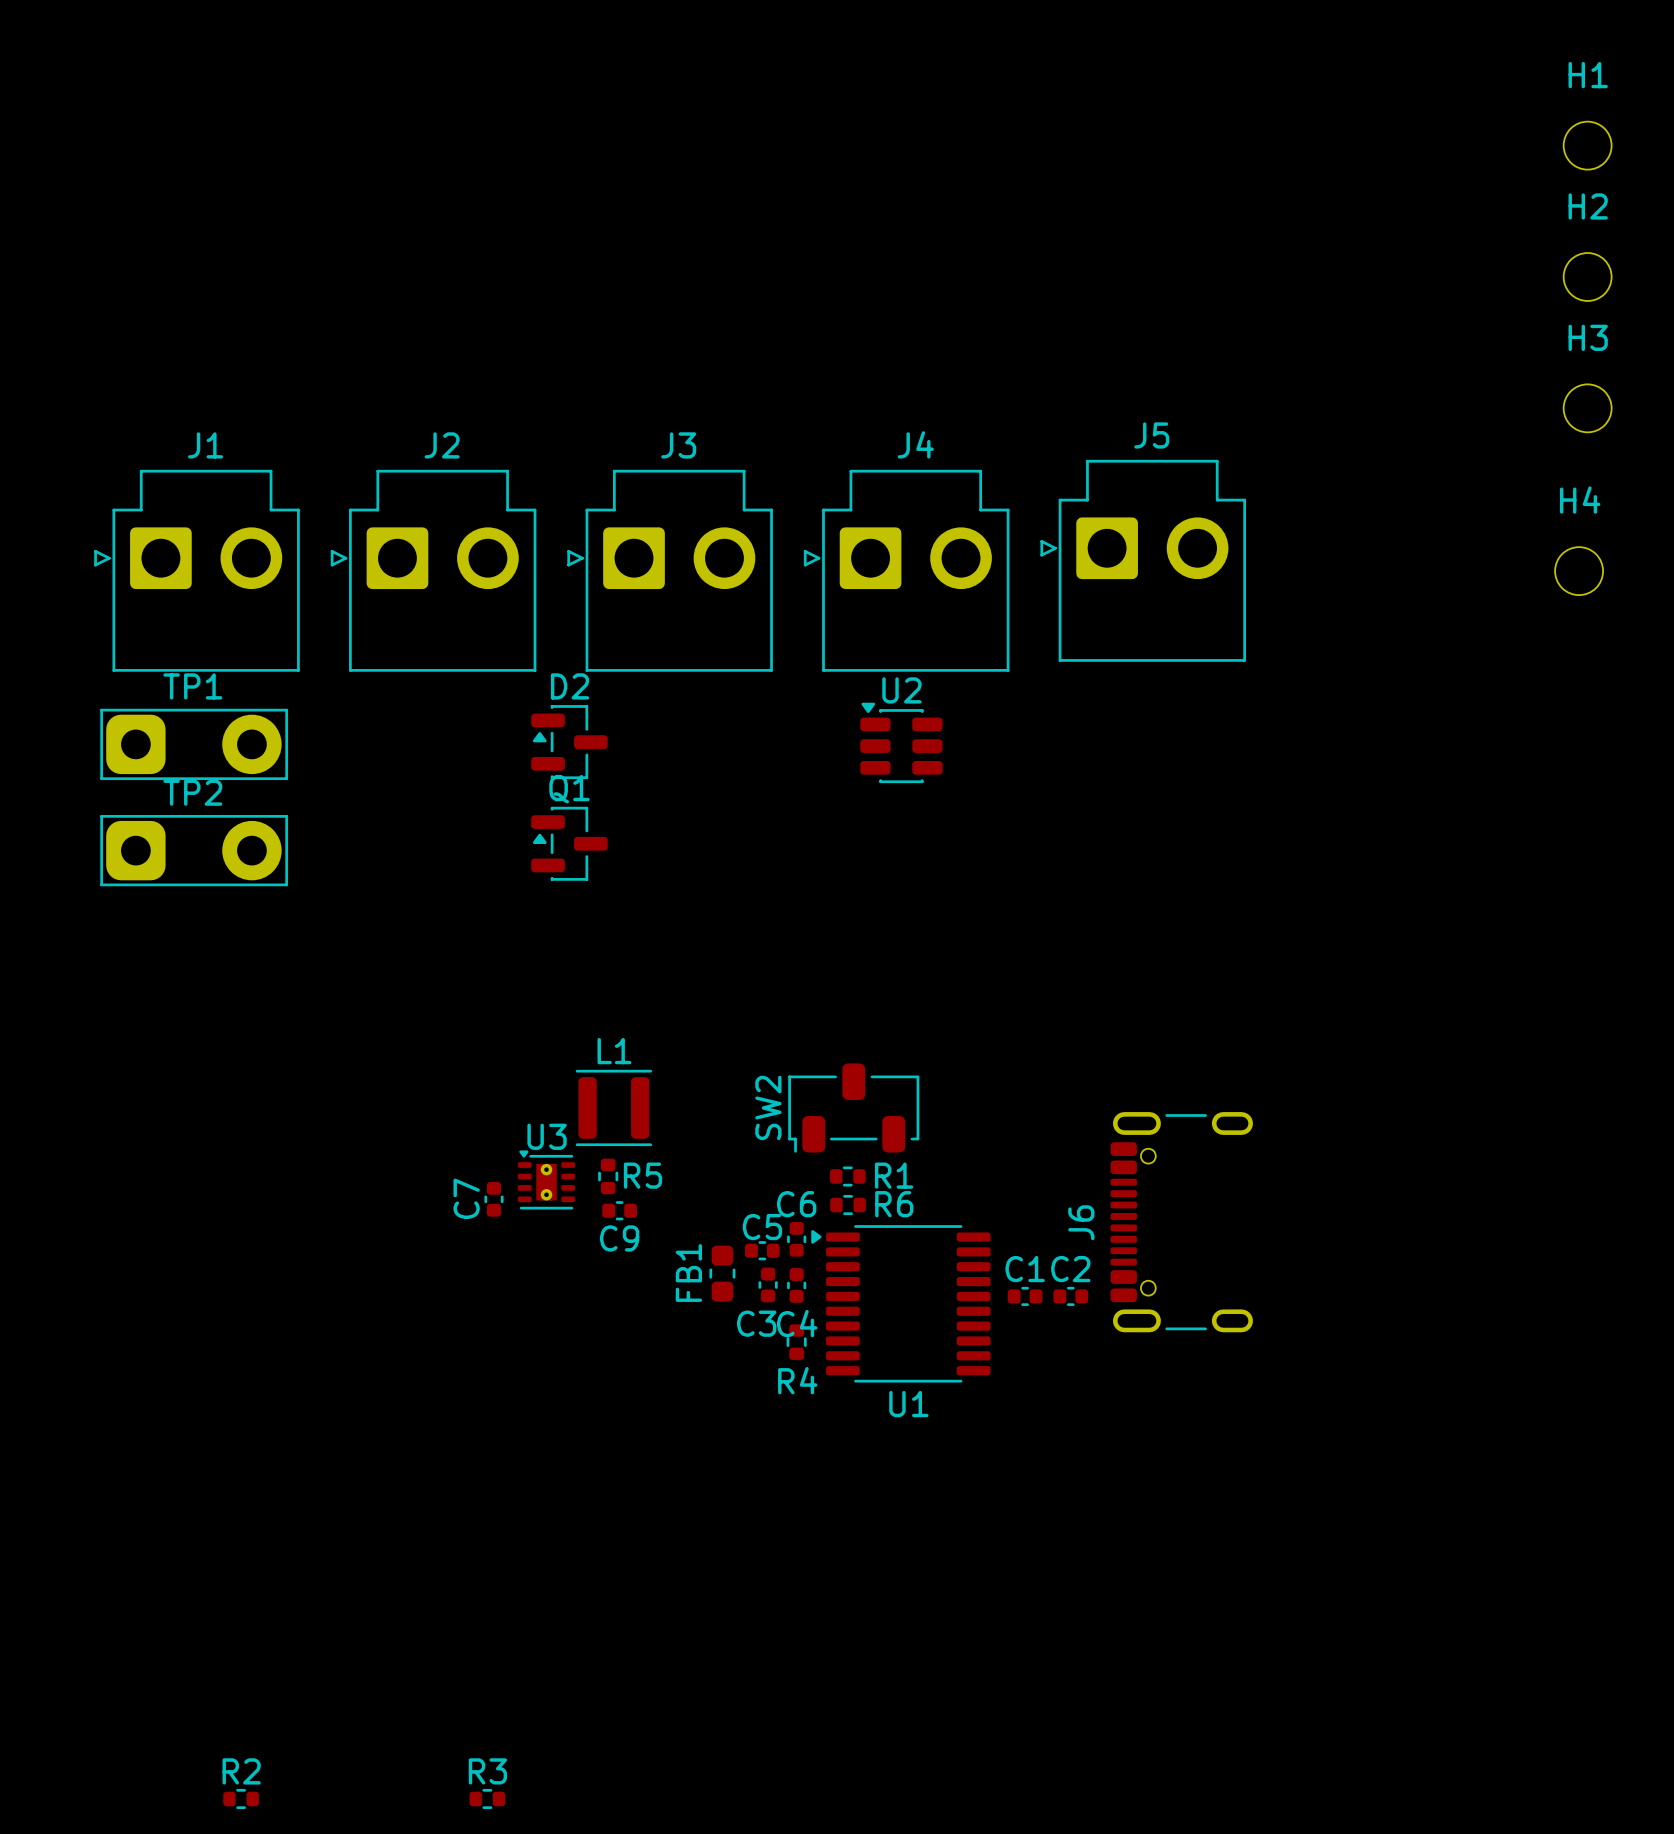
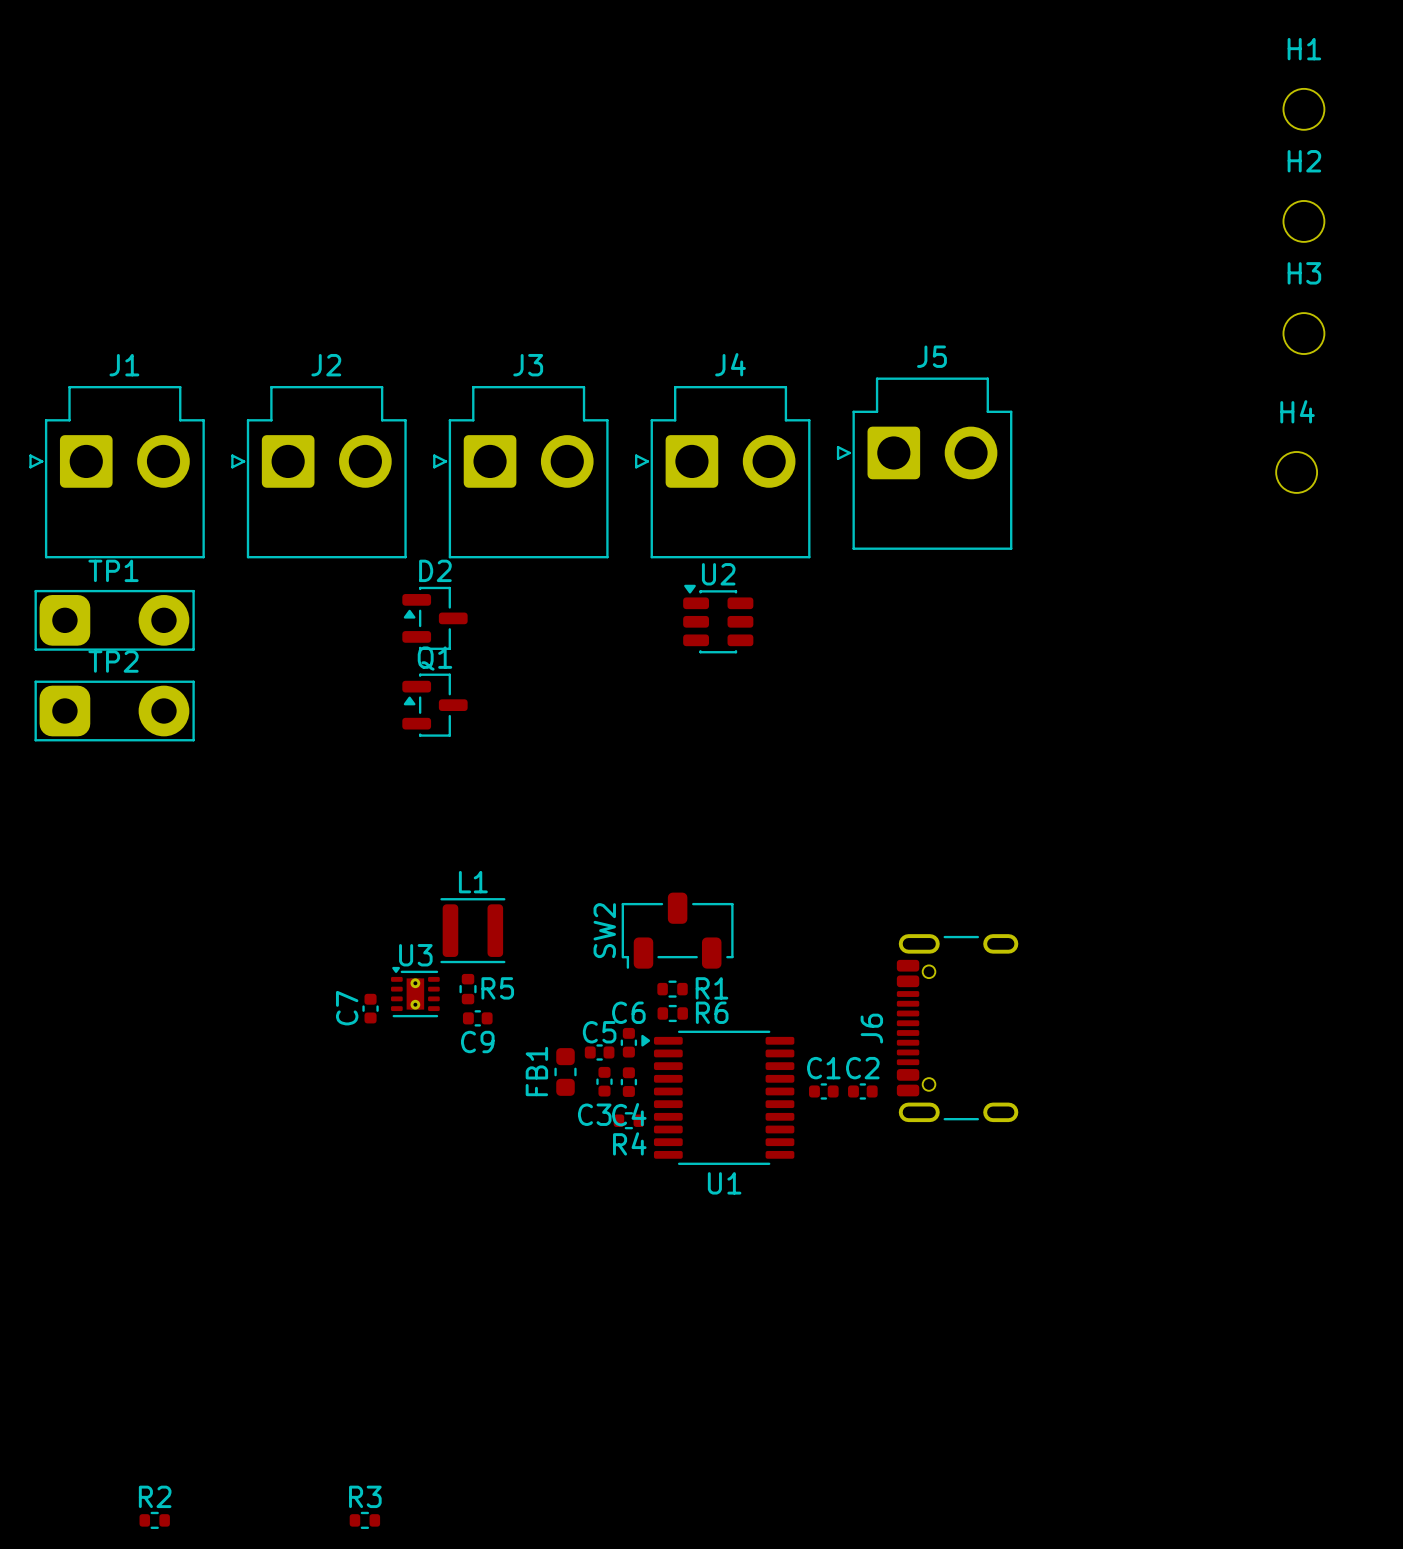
R4 rotation: 0° (796, 1342) -> 90° clockwise (628, 1120)

